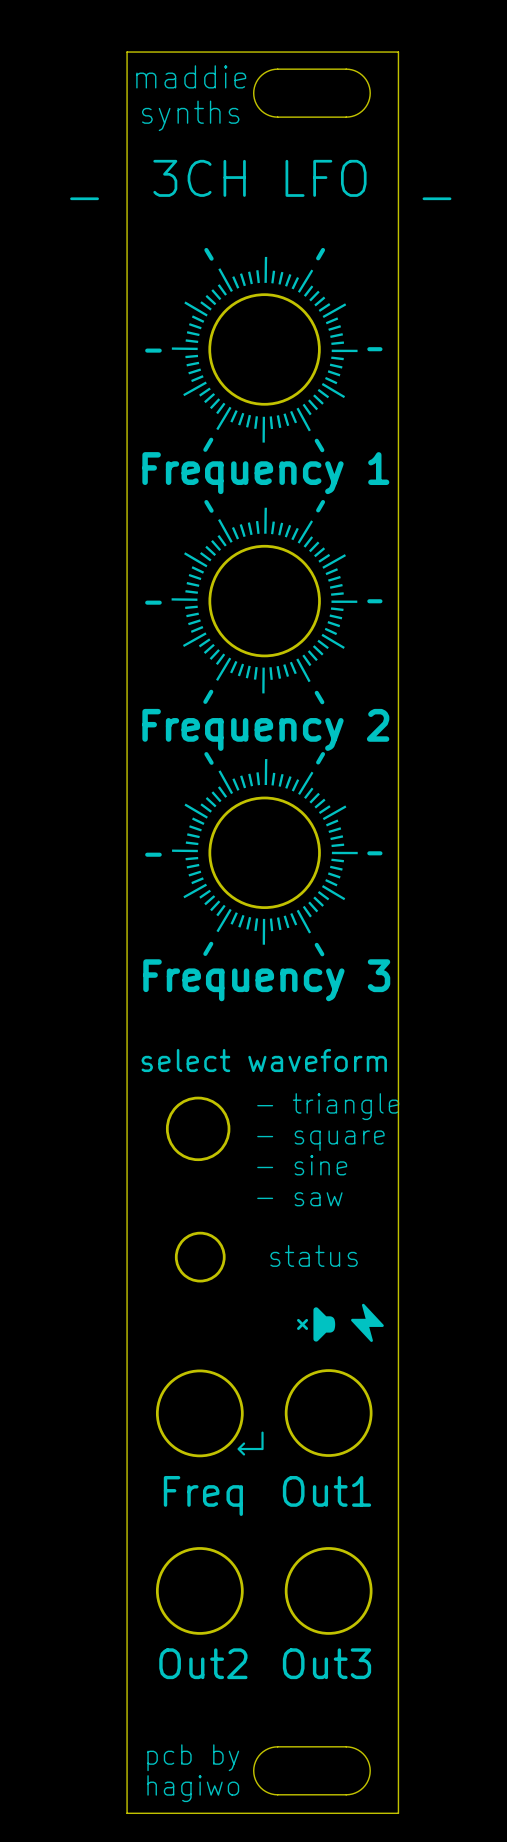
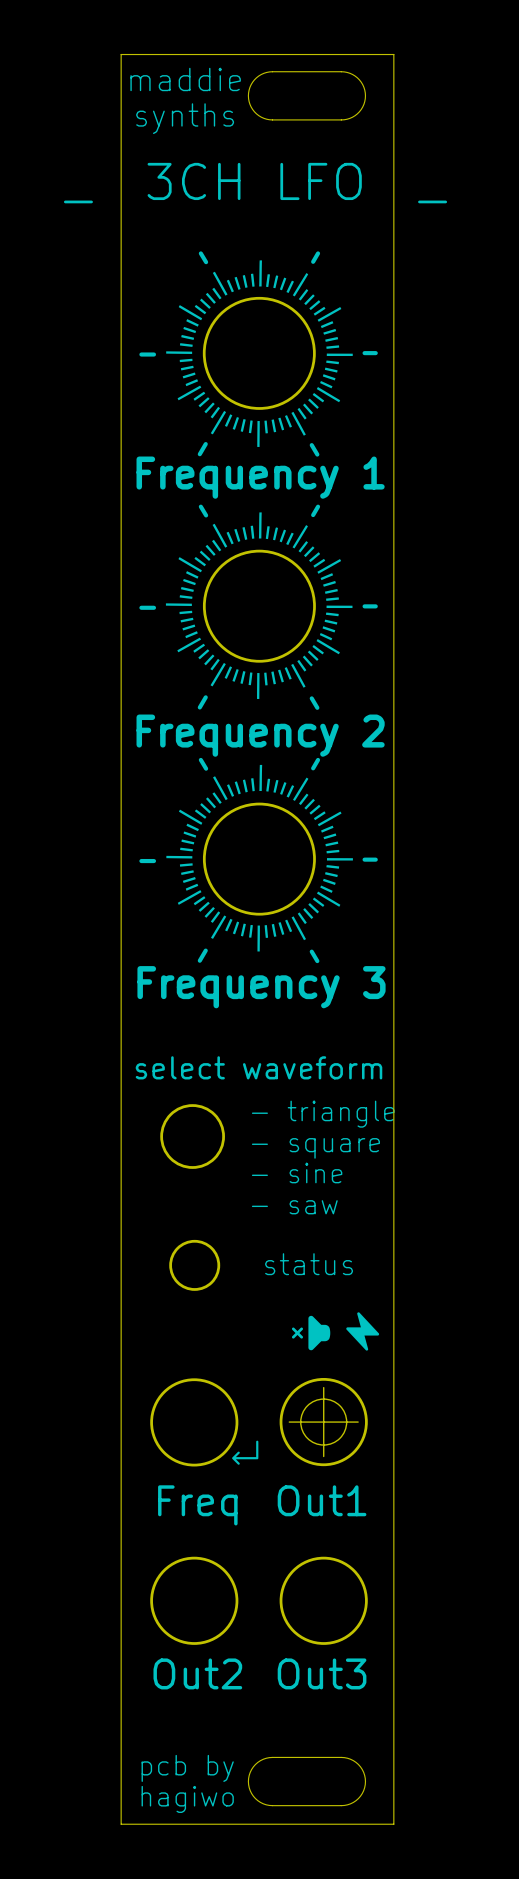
board edge: none -> (323, 1387) (323, 1456)
round board edge: none -> [300, 1398, 348, 1446]
board edge: none -> (358, 1422) (289, 1422)

